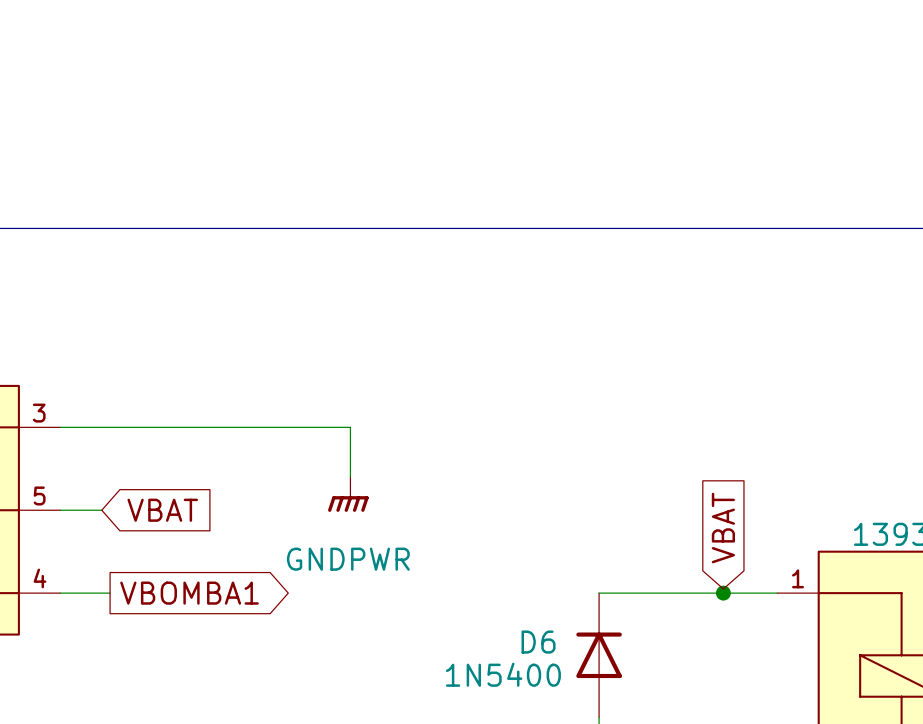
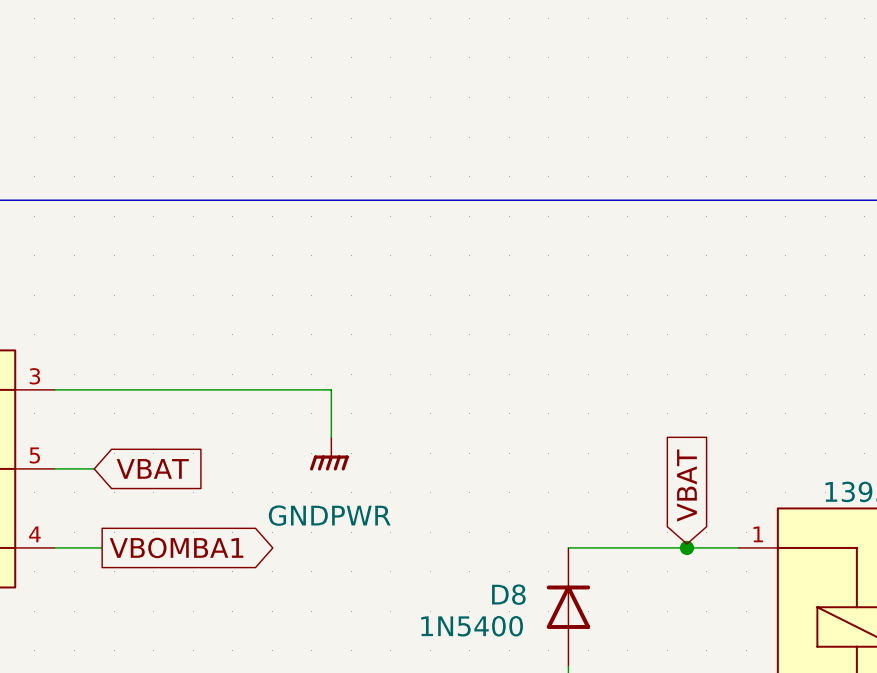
D6 name: D6 (538, 642) -> D8 (508, 594)

